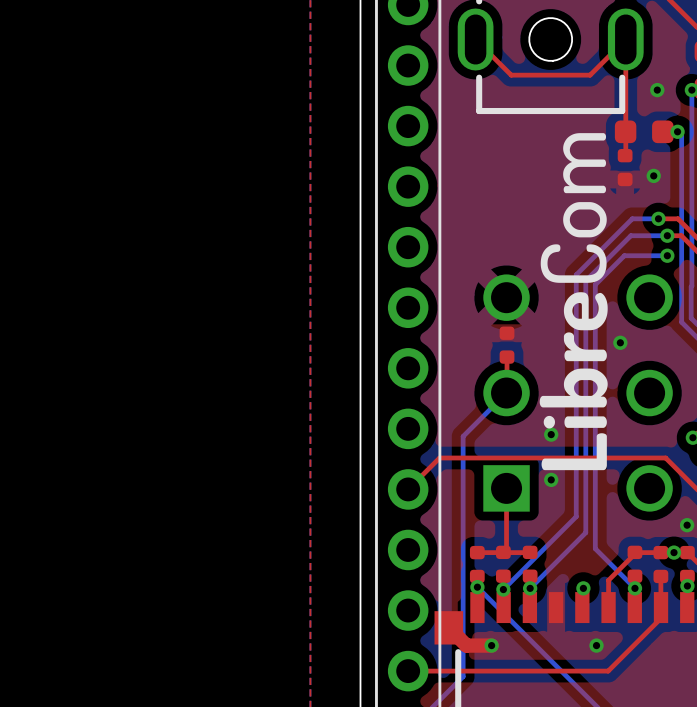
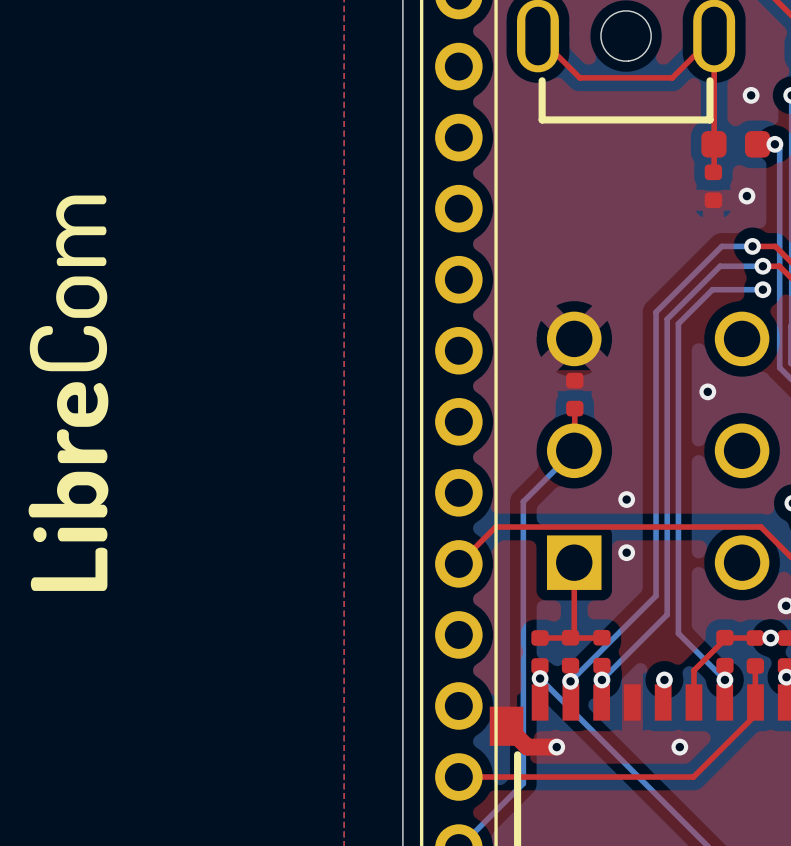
drawing position: (584, 163) -> (81, 230)
drawing position: (584, 219) -> (81, 297)
drawing position: (573, 263) -> (68, 348)
drawing position: (585, 311) -> (82, 404)
drawing position: (585, 346) -> (82, 446)
drawing position: (573, 388) -> (68, 494)
drawing position: (549, 422) -> (39, 534)
drawing position: (585, 422) -> (82, 534)
drawing position: (574, 451) -> (69, 569)

